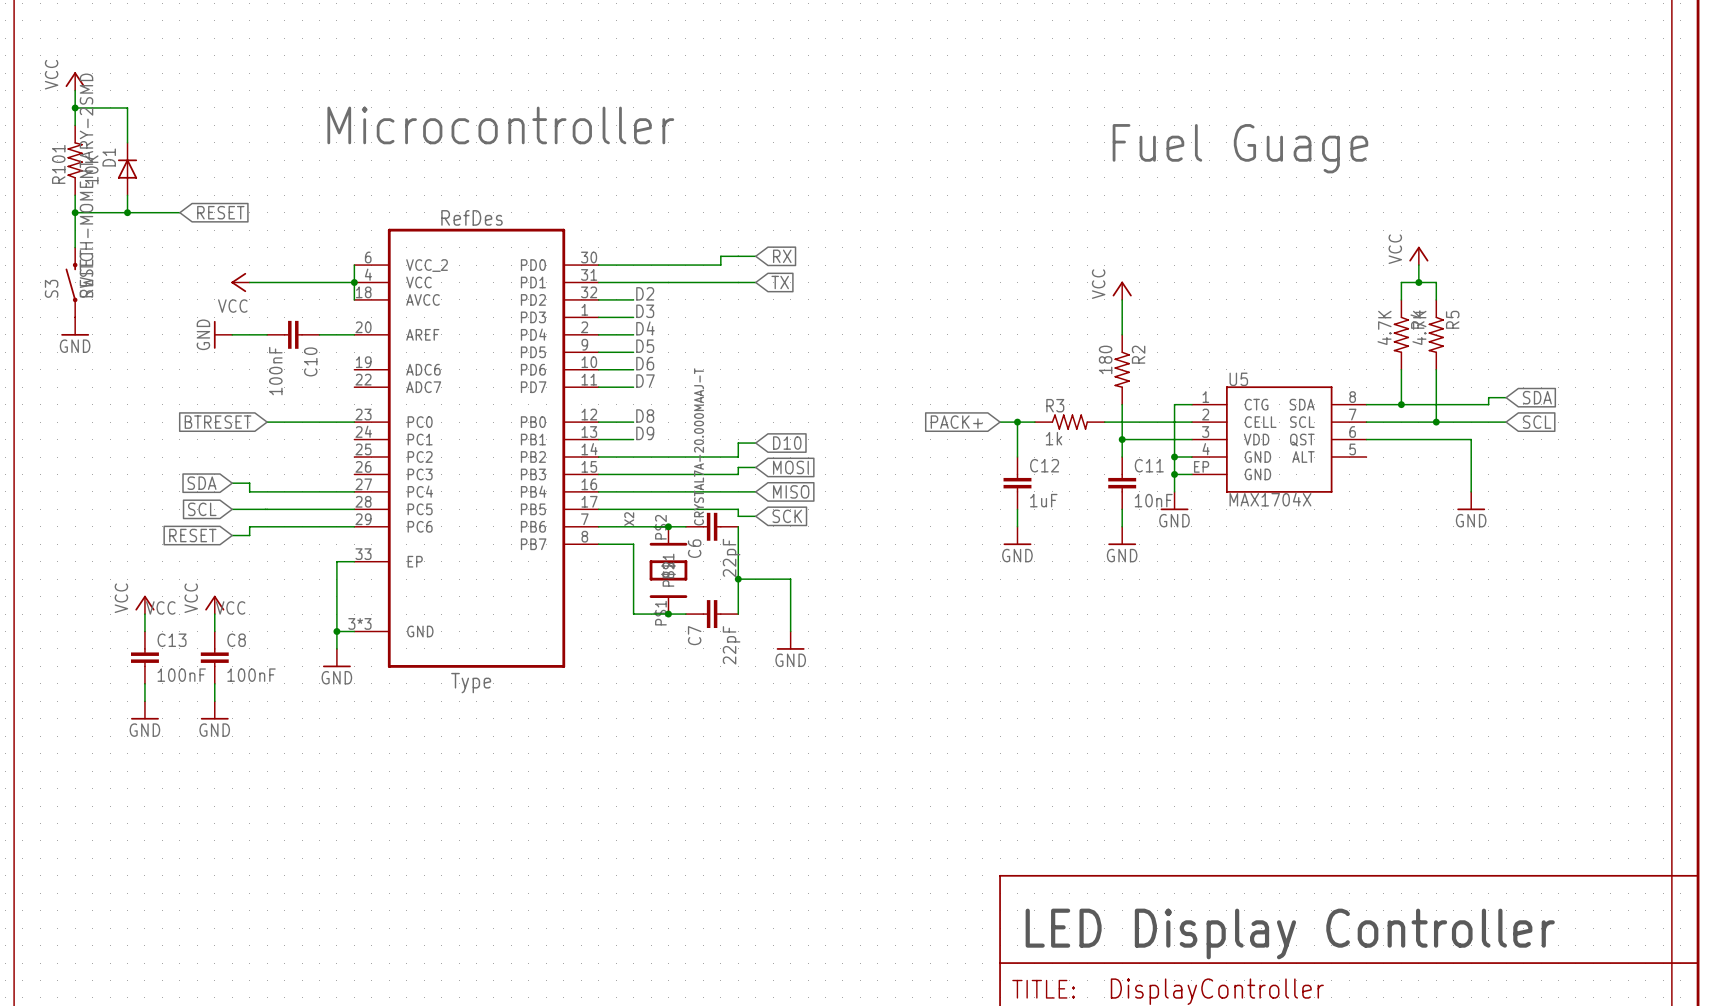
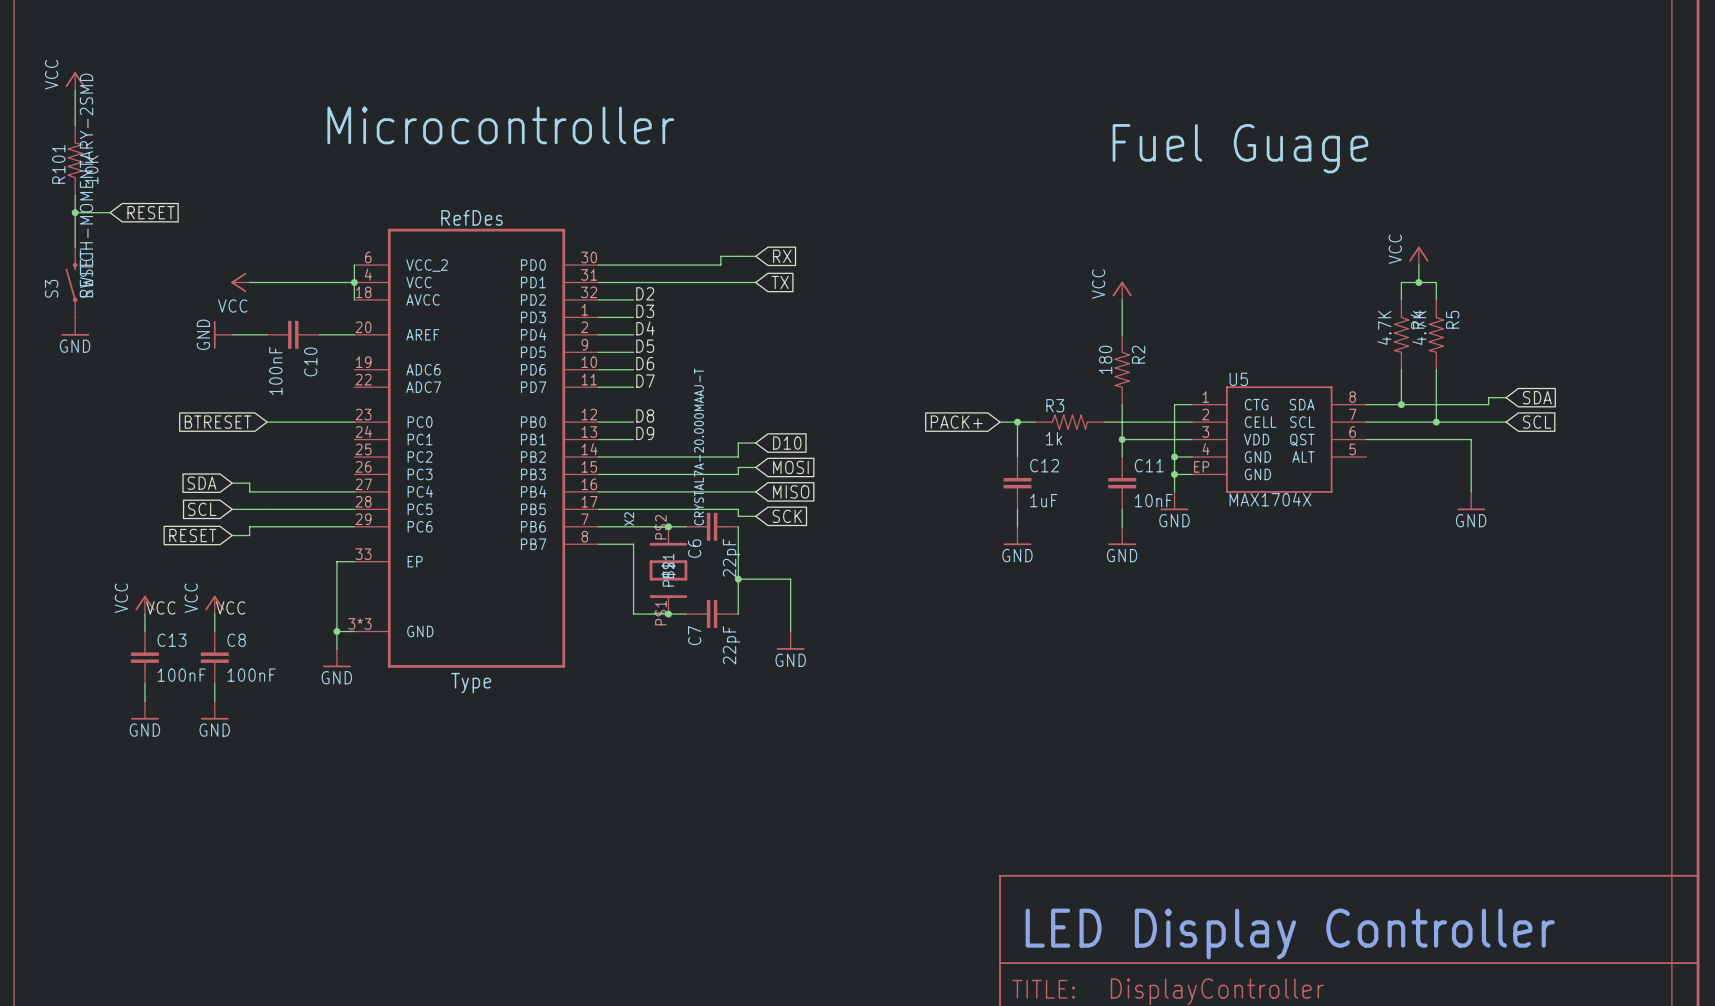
wire: (75, 107) (127, 107) (127, 142) -> none
junction: (75, 107) -> none
D1: (127, 169) -> none
wire: (127, 195) (127, 212) -> none
wire: (110, 212) (179, 212) -> none
junction: (127, 212) -> none
global label position: RESET (220, 212) -> RESET (151, 212)

